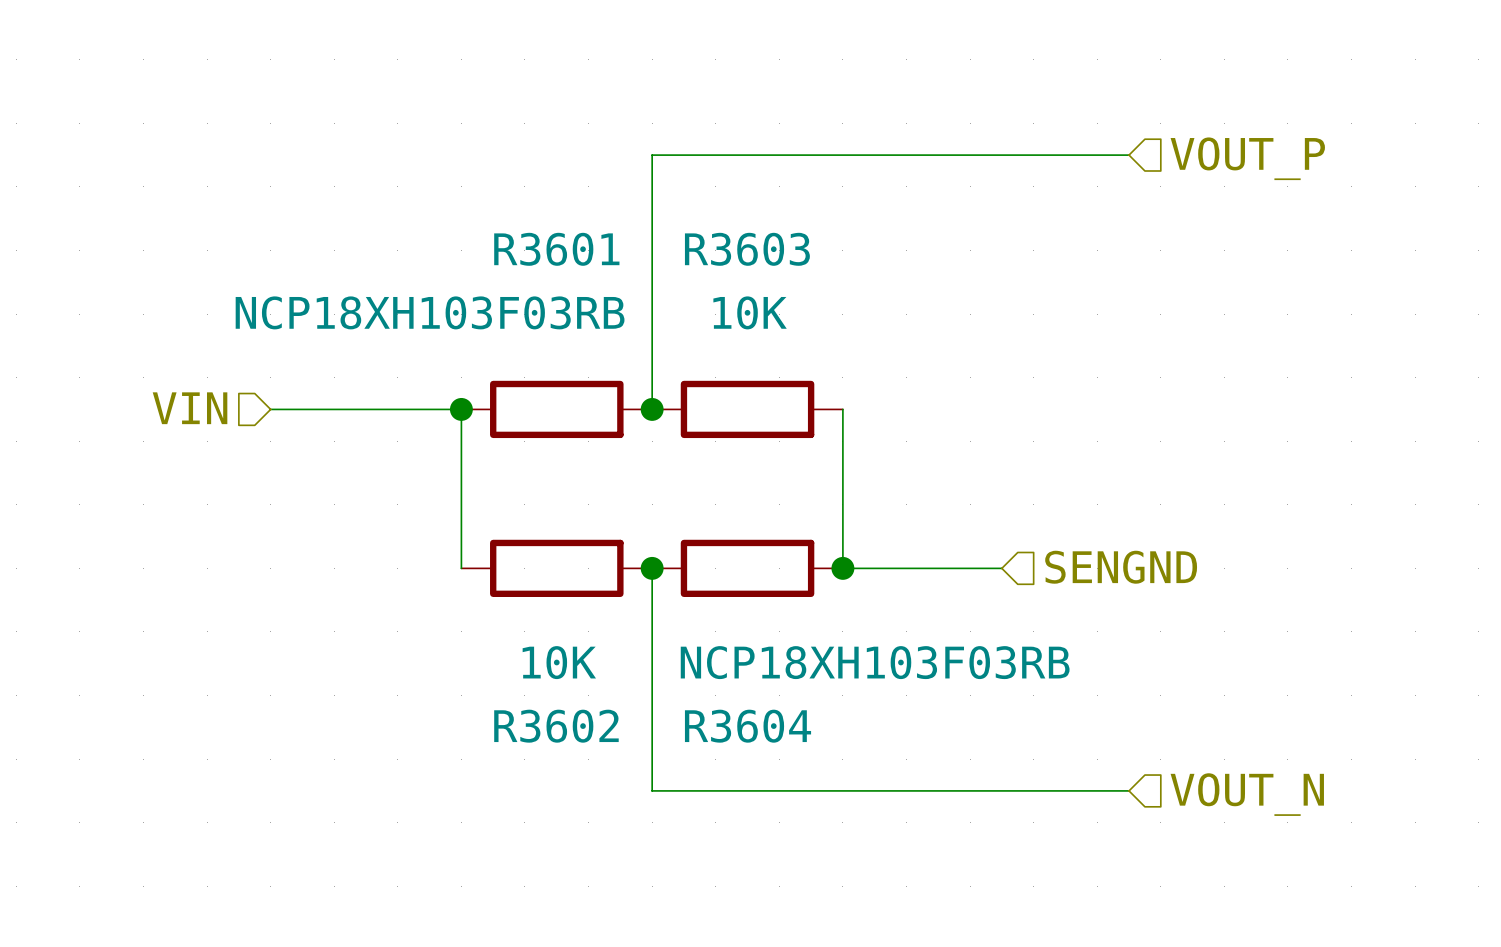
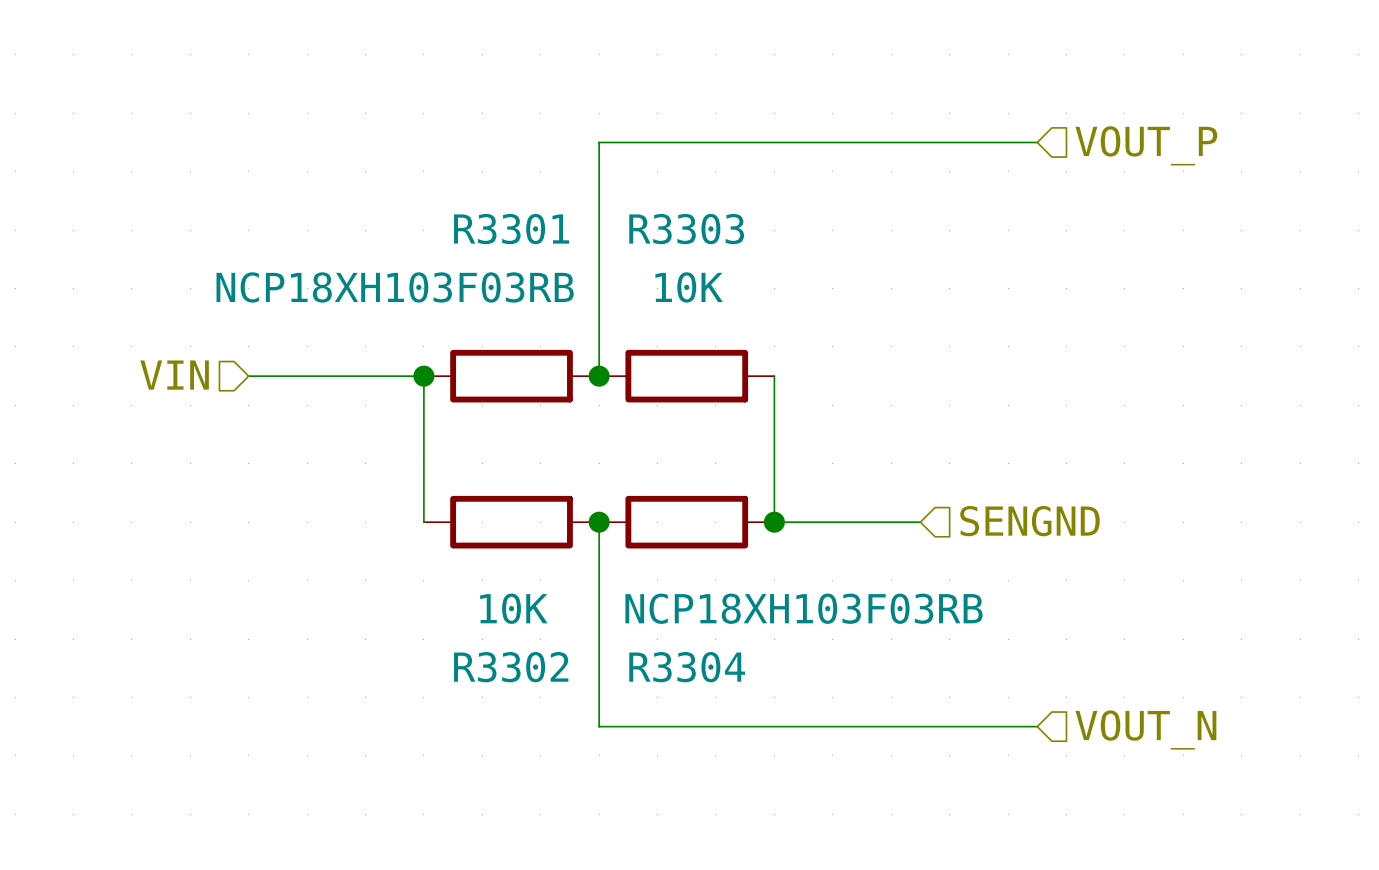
R3601 name: R3601 (556, 249) -> R3301 (511, 229)
R3603 name: R3603 (747, 249) -> R3303 (686, 229)
R3602 name: R3602 (556, 726) -> R3302 (511, 667)
R3604 name: R3604 (748, 726) -> R3304 (687, 667)

